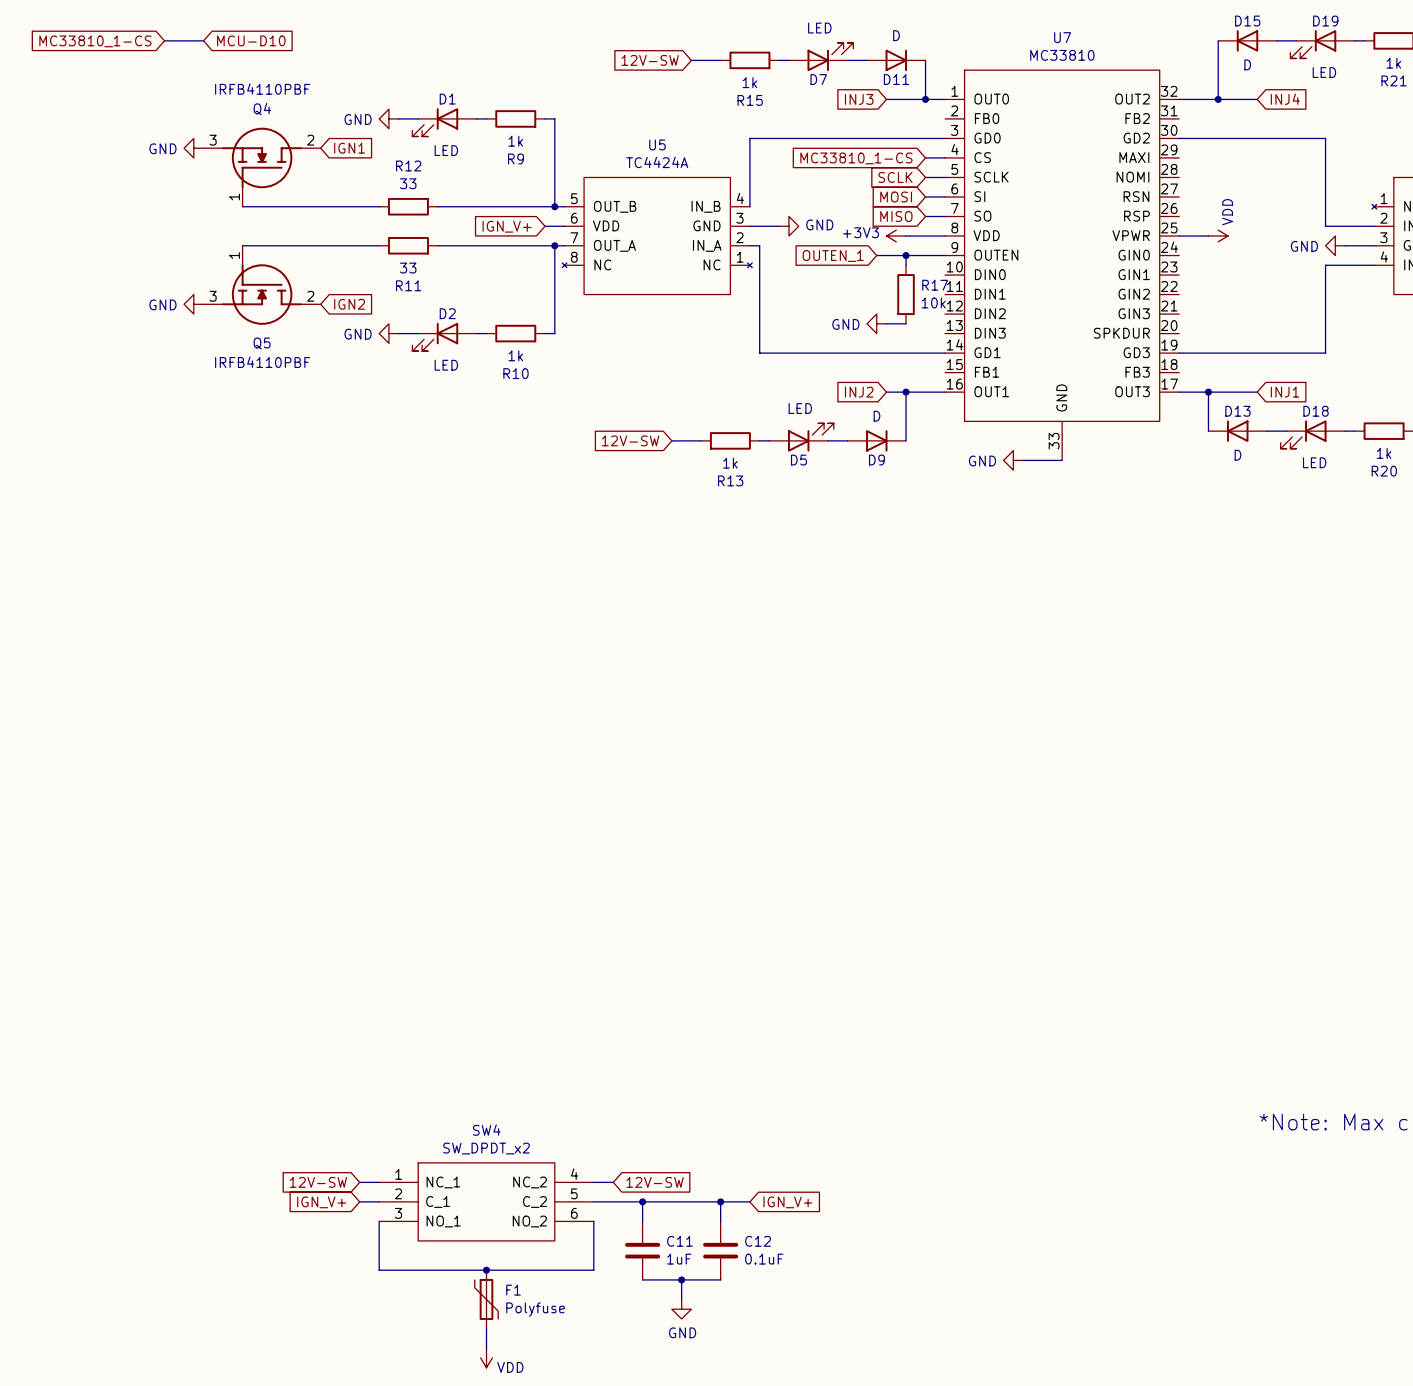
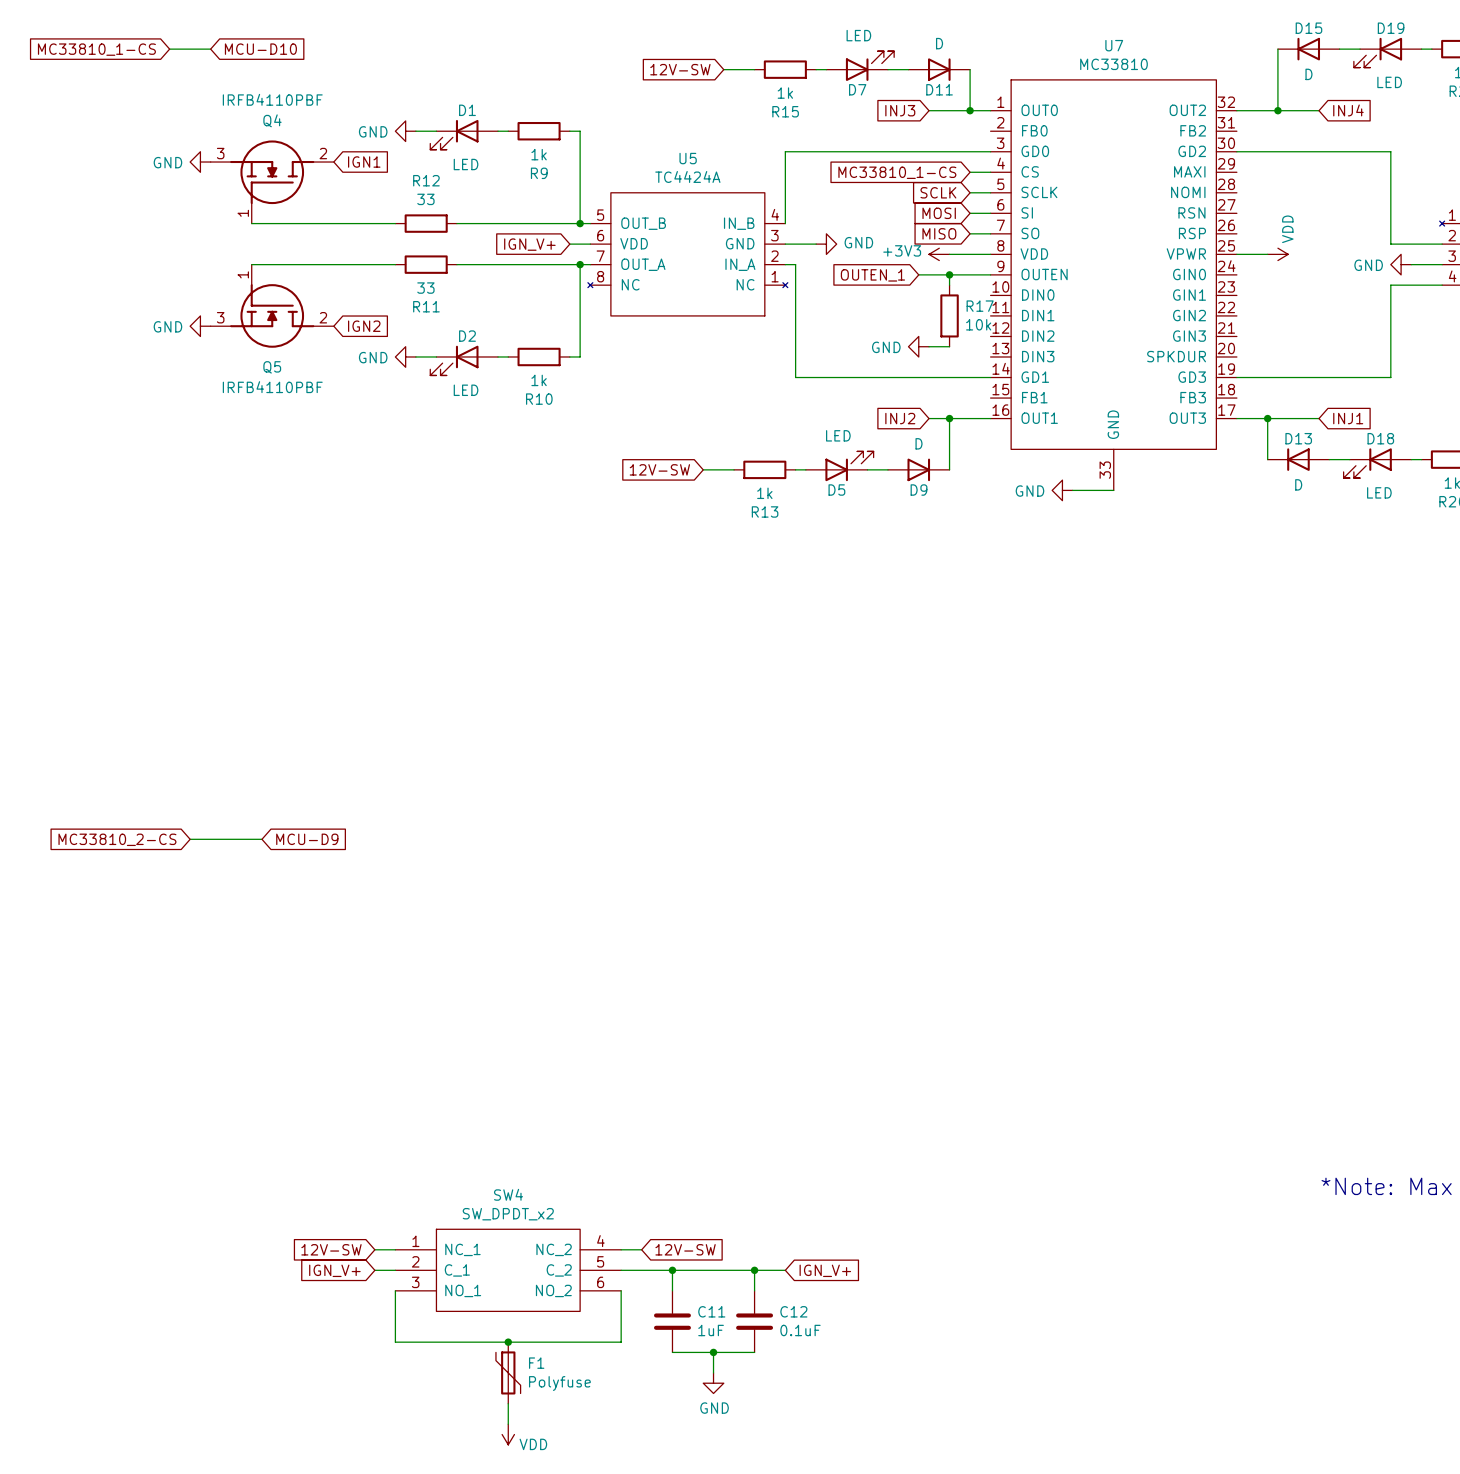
global label: none -> MC33810_2-CS (117, 839)
wire: none -> (190, 839) (261, 839)
global label: none -> MCU-D9 (307, 839)

